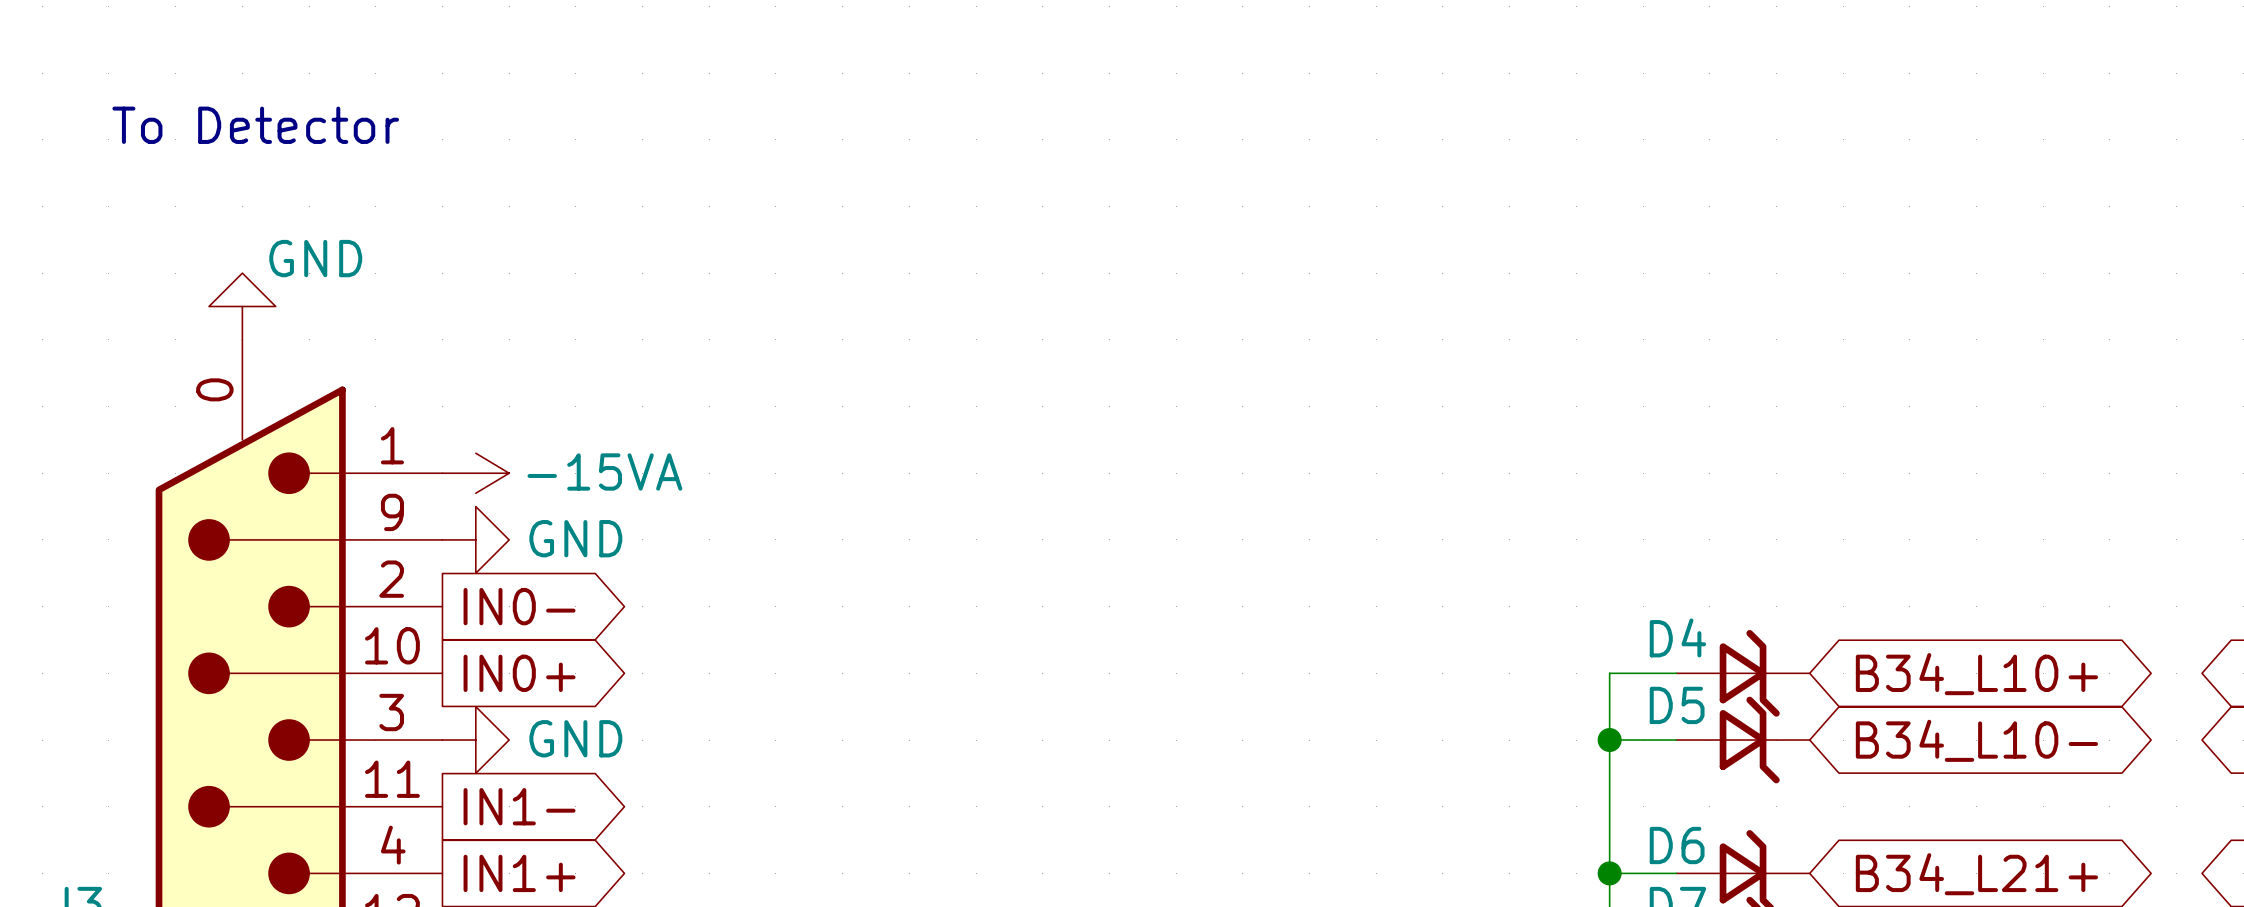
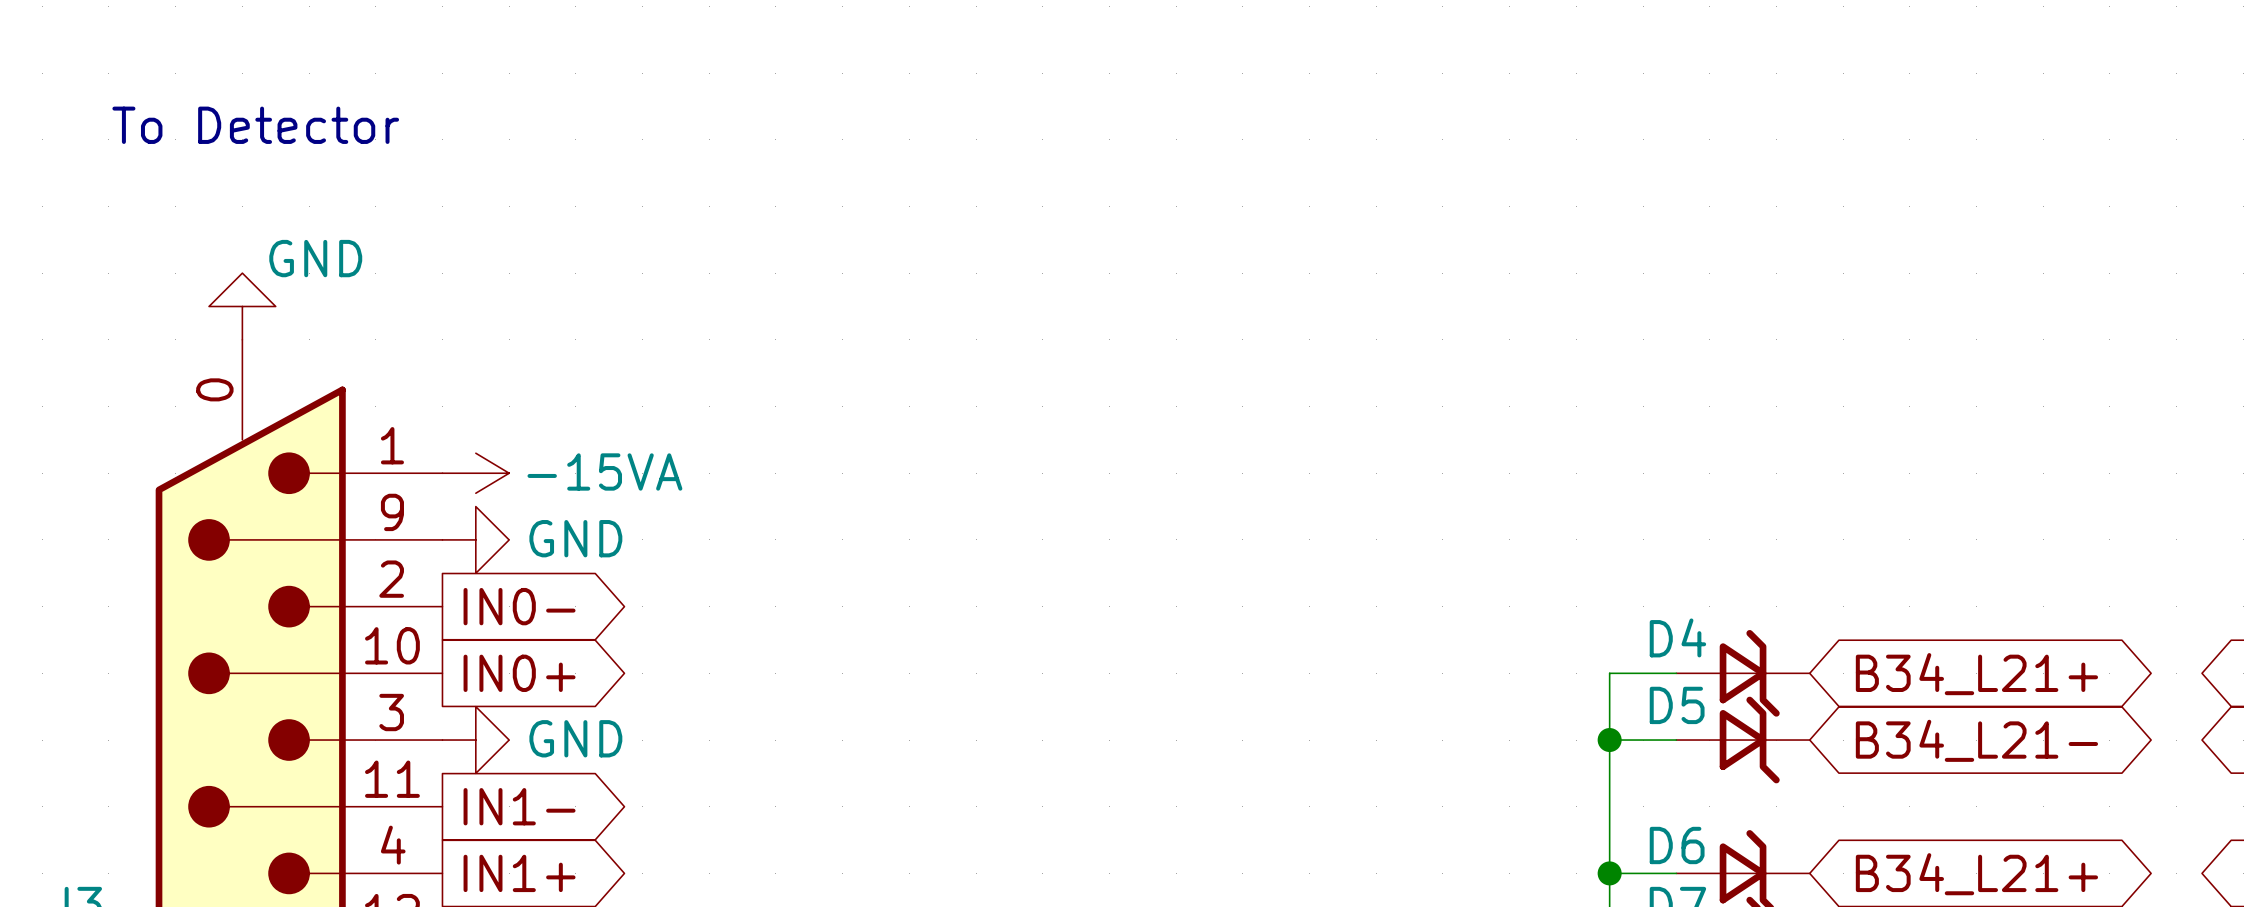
global label: B34_L10+ (1976, 674) -> B34_L21+ (1976, 674)
global label: B34_L10- (1976, 740) -> B34_L21- (1976, 740)

